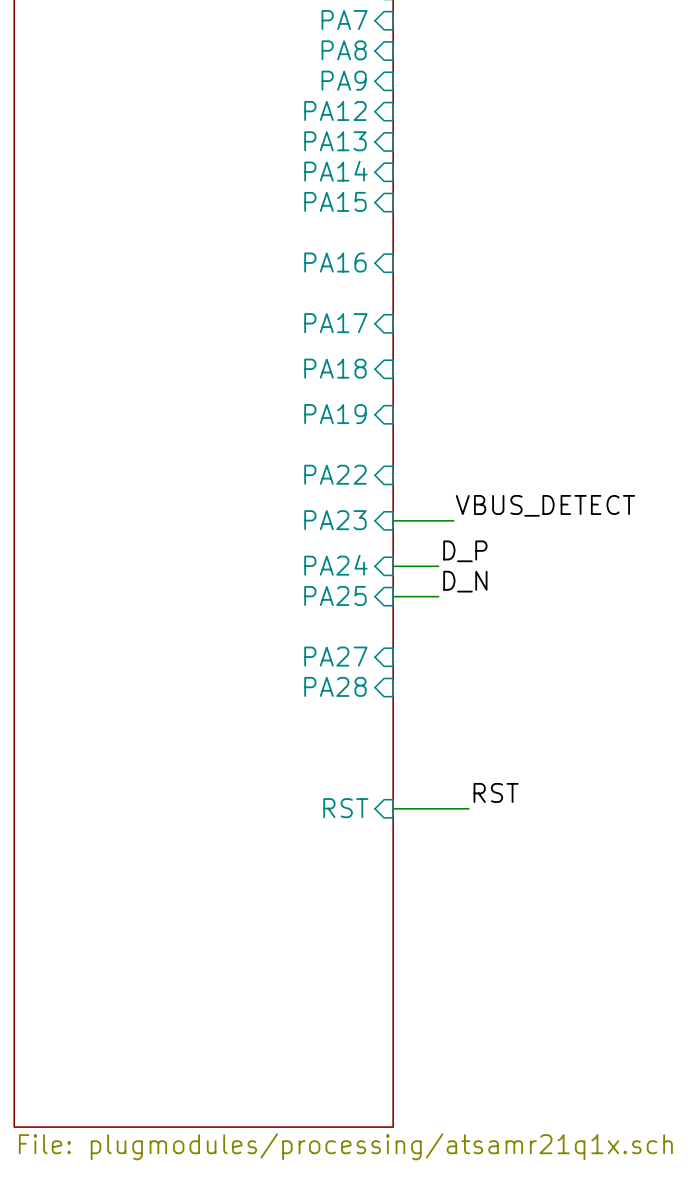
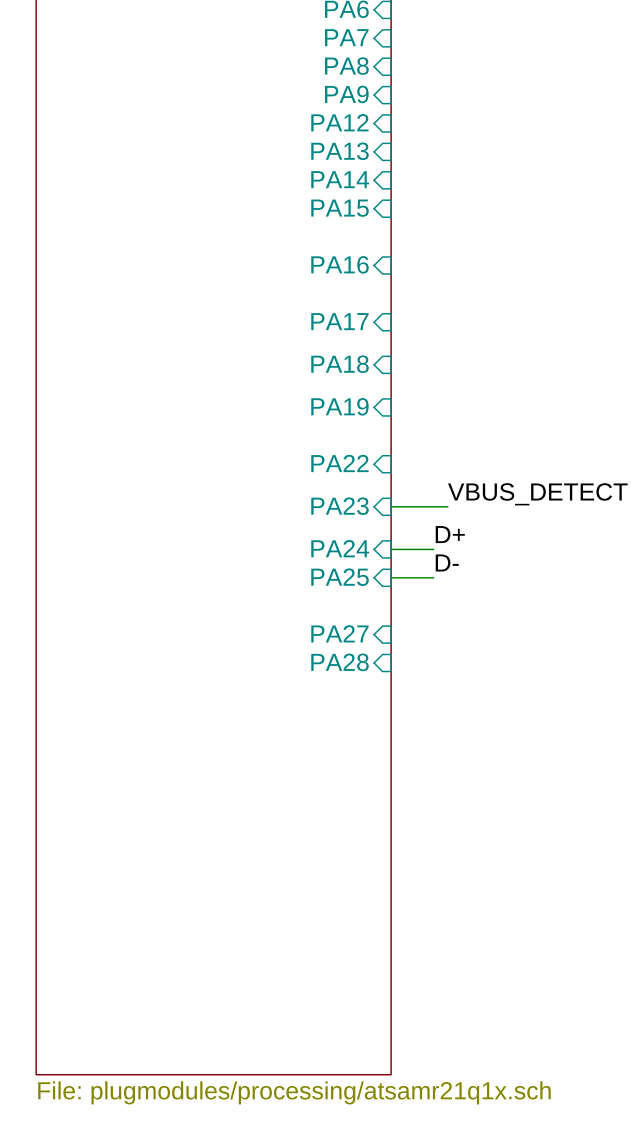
label: D_P (465, 551) -> D+ (450, 534)
label: D_N (465, 581) -> D- (447, 562)
label: RST (496, 792) -> none
sheet pin: RST (345, 808) -> none
wire: (393, 808) (468, 808) -> none

